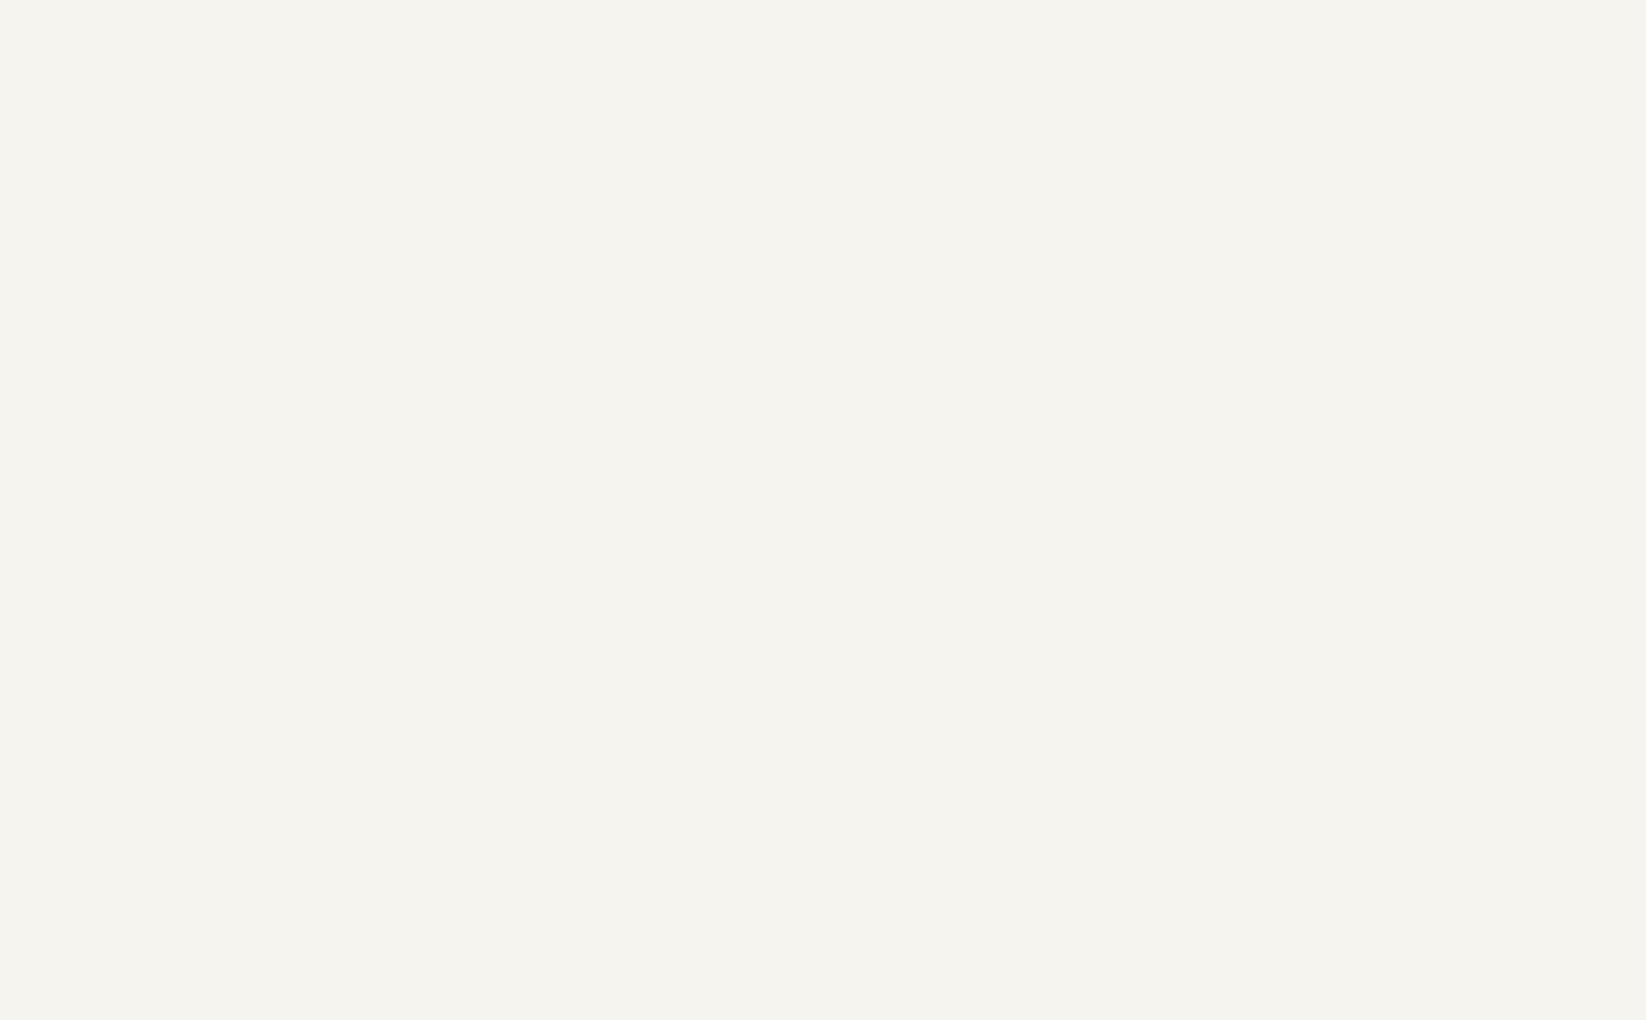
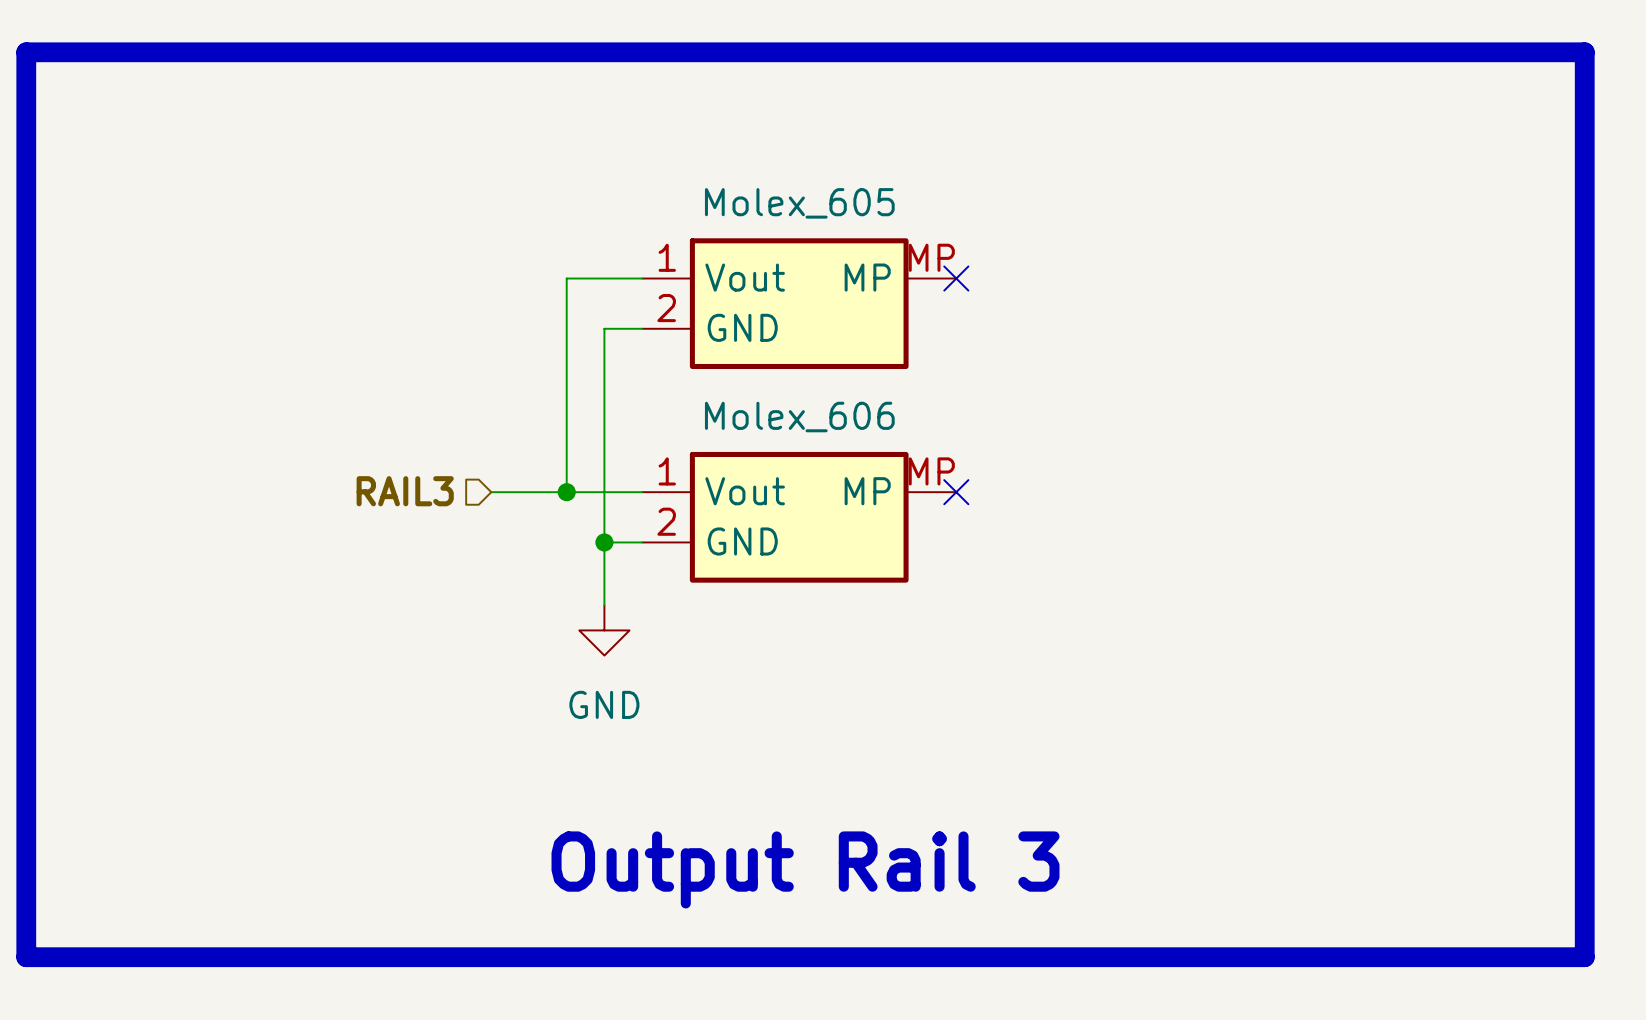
line: none -> (26, 52) (26, 957) (1584, 957) (1584, 52) (26, 52)
wire: none -> (642, 278) (566, 278) (566, 492)
no-connect mark: none -> (956, 278)
Molex_605: none -> (799, 303)
wire: none -> (642, 328) (604, 328) (604, 542)
hierarchical label: none -> RAIL3 (405, 491)
wire: none -> (491, 492) (642, 492)
junction: none -> (566, 492)
no-connect mark: none -> (956, 492)
Molex_606: none -> (799, 517)
wire: none -> (604, 542) (642, 542)
wire: none -> (604, 542) (604, 605)
junction: none -> (604, 542)
power symbol: none -> GND (604, 630)
text: none -> Output Rail 3 (805, 869)

